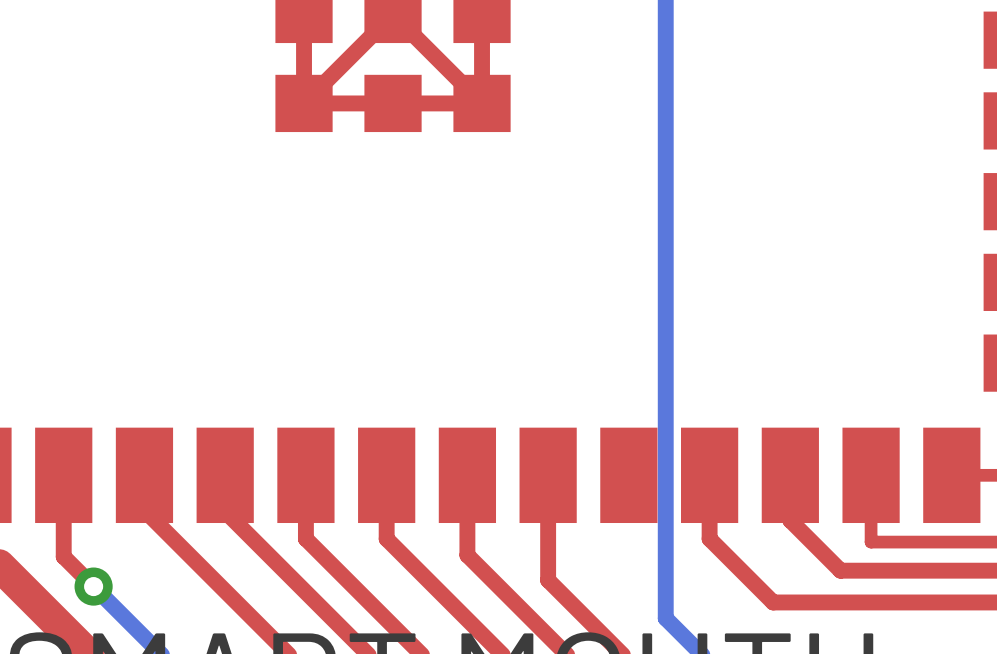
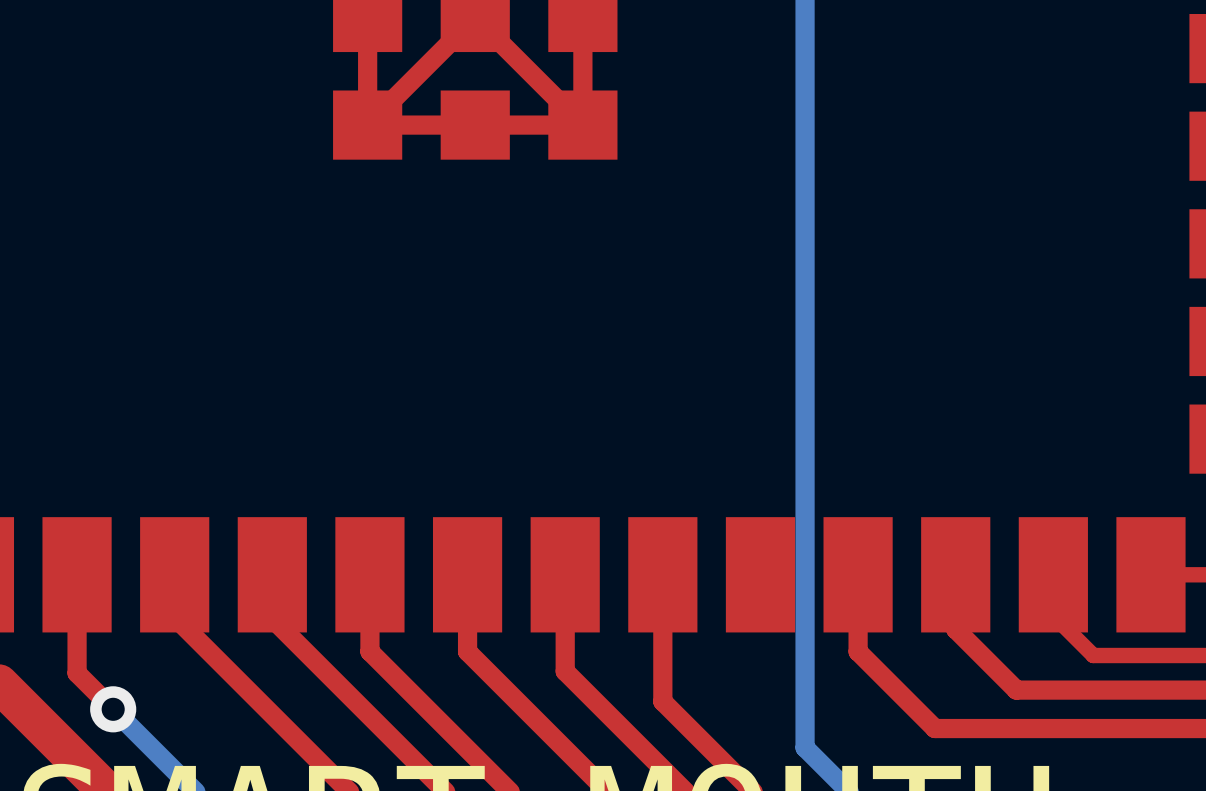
top track: (871, 475) (871, 542) (904, 542) -> (1053, 615) (1093, 655)

